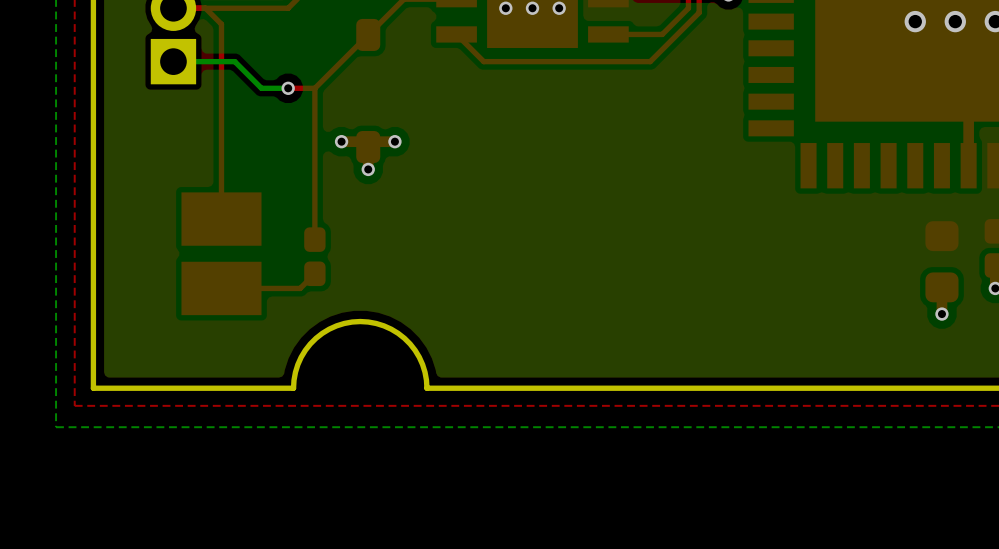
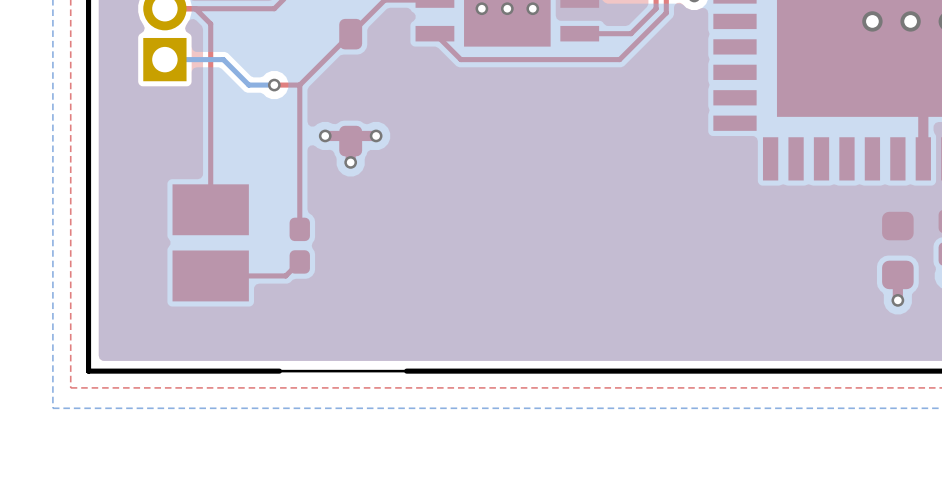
board edge: (426, 388) (422, 364) (415, 350) (404, 338) (383, 325) (360, 321) (336, 325) (316, 338) (305, 350) (297, 364) (293, 388) -> (406, 371) (279, 371)

